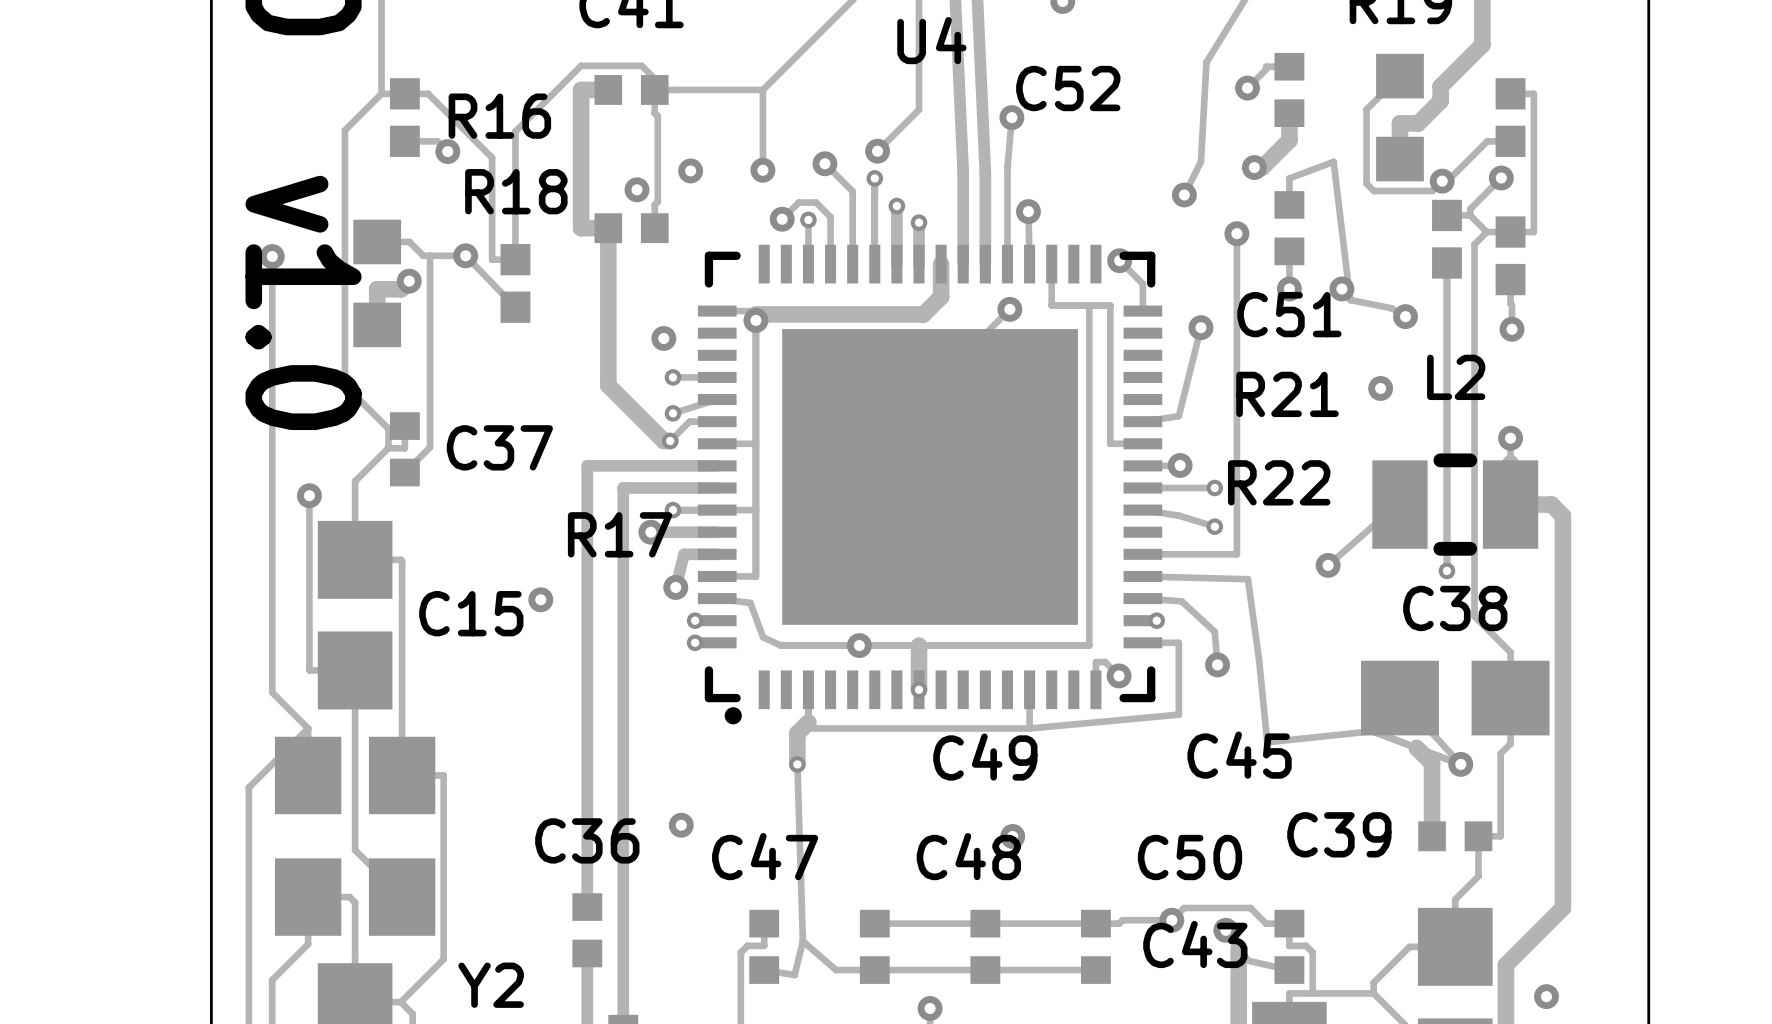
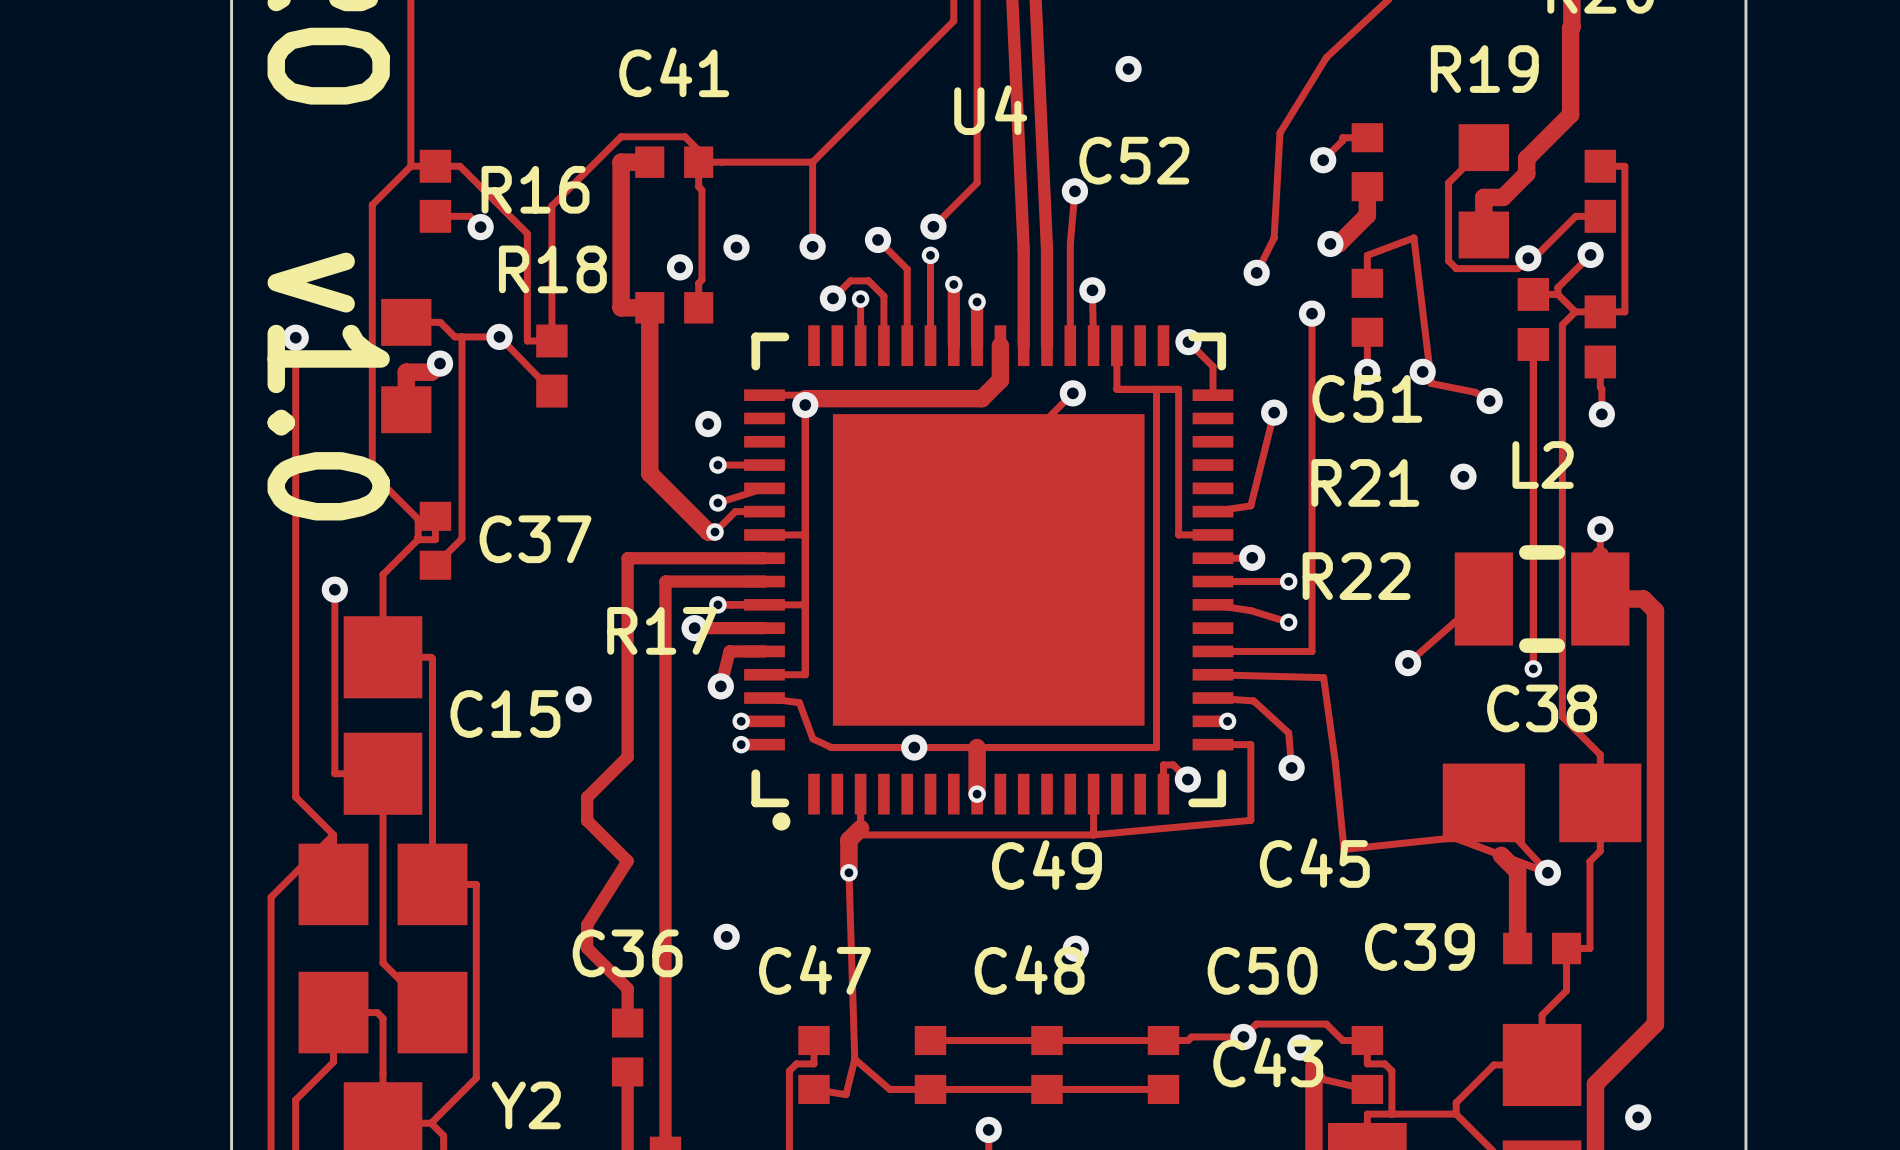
track: (587, 654) (587, 874) -> (627, 756) (587, 797) (587, 820) (627, 861) (587, 924) (587, 948) (627, 988)

